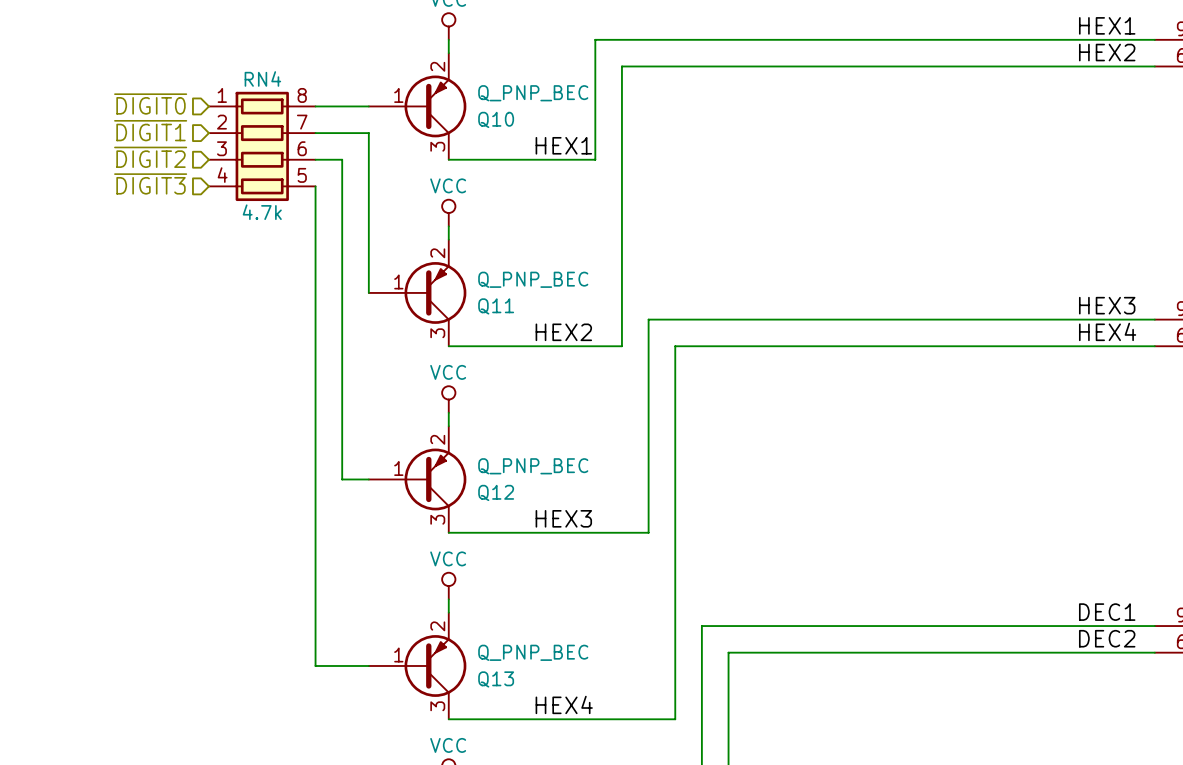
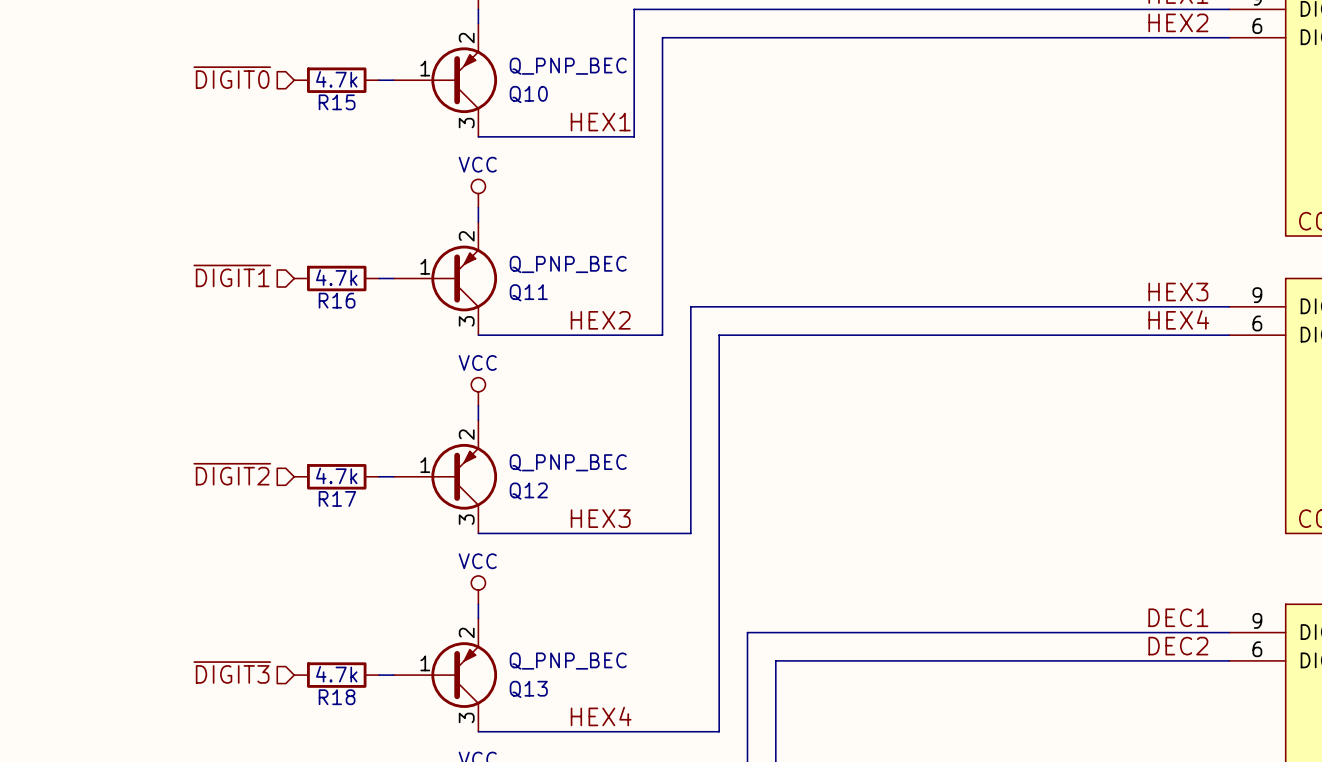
hierarchical label position: ~{DIGIT0} (150, 104) -> ~{DIGIT0} (232, 77)
R15: none -> 4.7k (336, 80)
hierarchical label position: ~{DIGIT1} (150, 130) -> ~{DIGIT1} (232, 275)
wire: (315, 133) (368, 133) (368, 292) -> (379, 278) (393, 278)
RN4: 4.7k (262, 146) -> none
hierarchical label: ~{DIGIT2} (150, 157) -> none
wire: (315, 159) (342, 159) (342, 479) (355, 479) -> none
hierarchical label: ~{DIGIT3} (150, 183) -> none
wire: (315, 186) (315, 665) (355, 665) -> none
R16: none -> 4.7k (336, 278)
hierarchical label: none -> ~{DIGIT2} (232, 474)
R17: none -> 4.7k (336, 476)
hierarchical label: none -> ~{DIGIT3} (232, 672)
R18: none -> 4.7k (336, 675)

